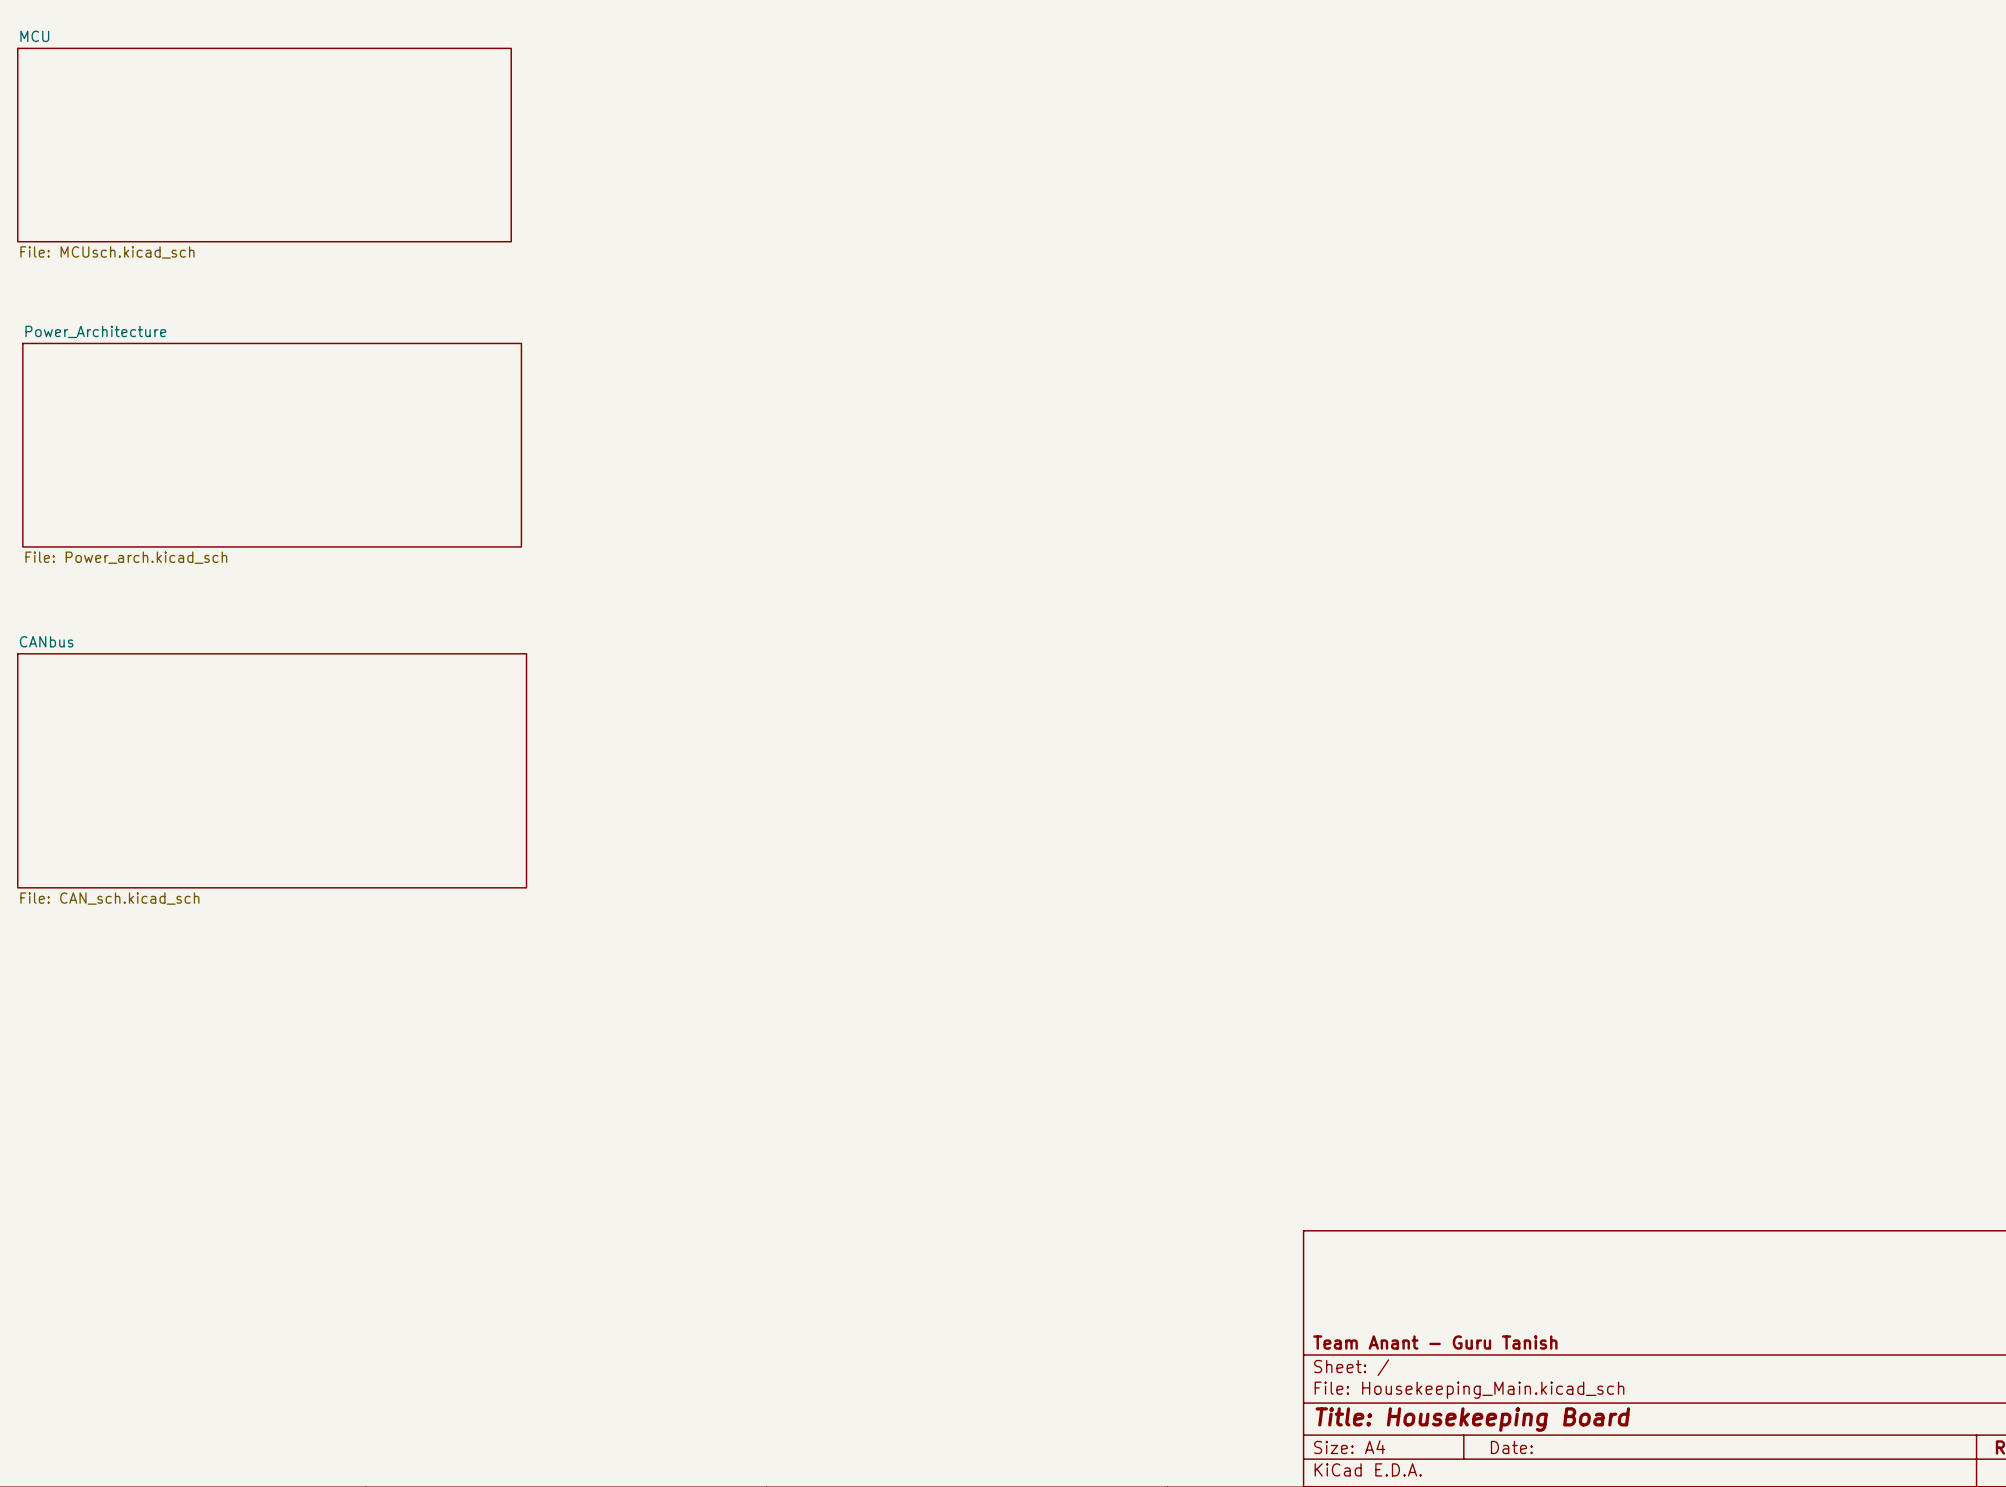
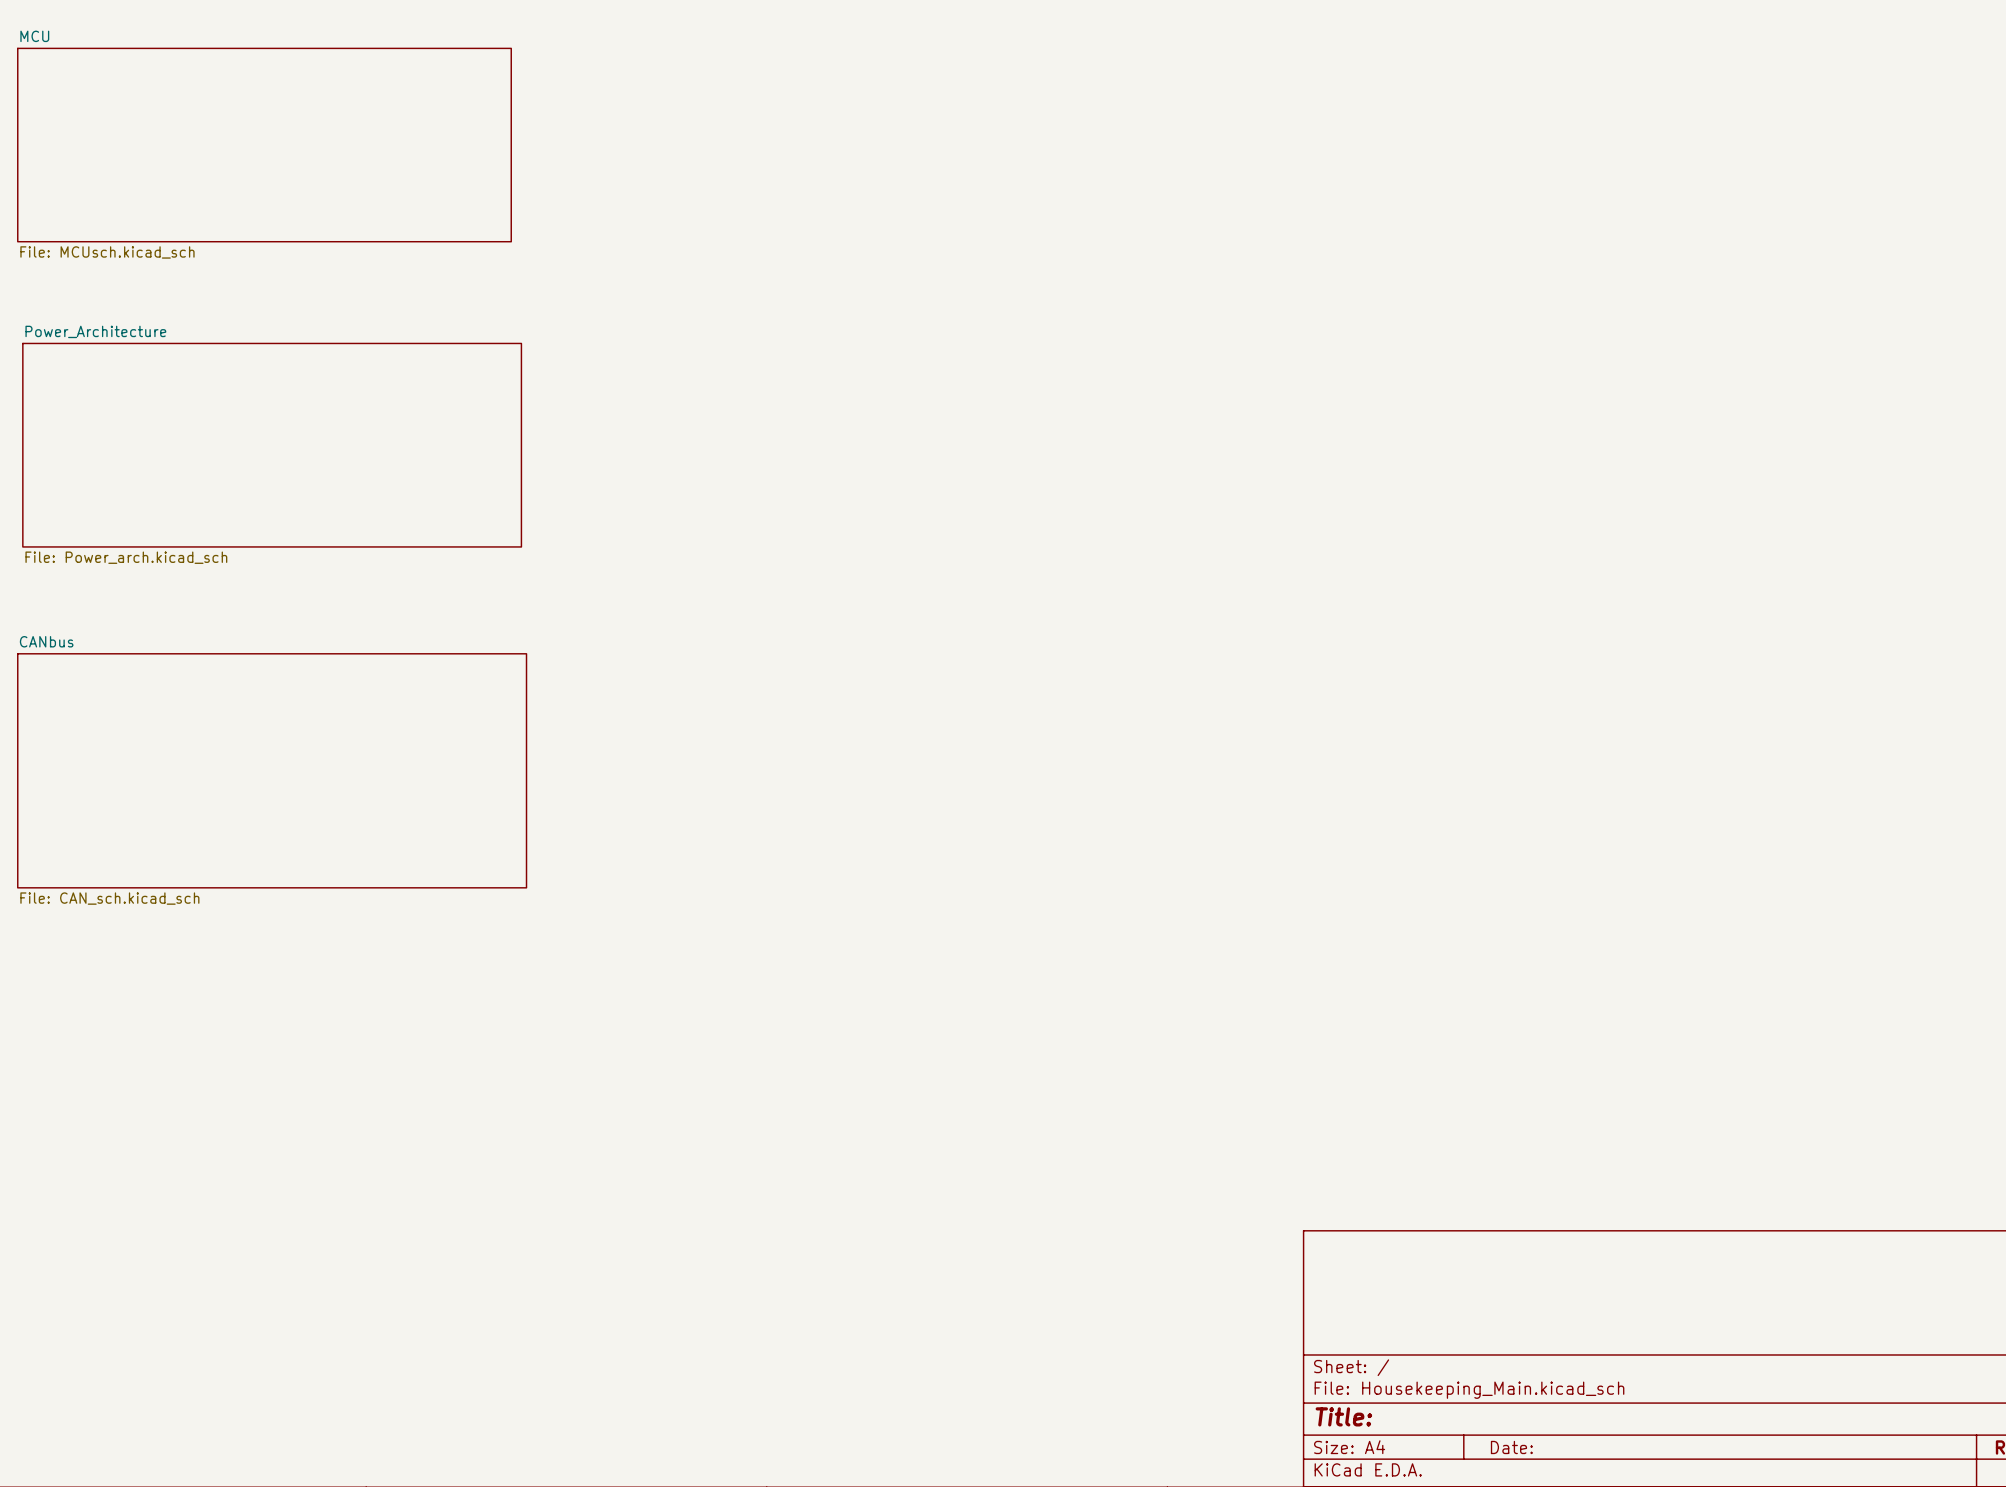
title block: Team Anant - Guru Tanish (1435, 1342) -> none
title block: Title: Housekeeping Board (1472, 1419) -> Title: (1343, 1416)

